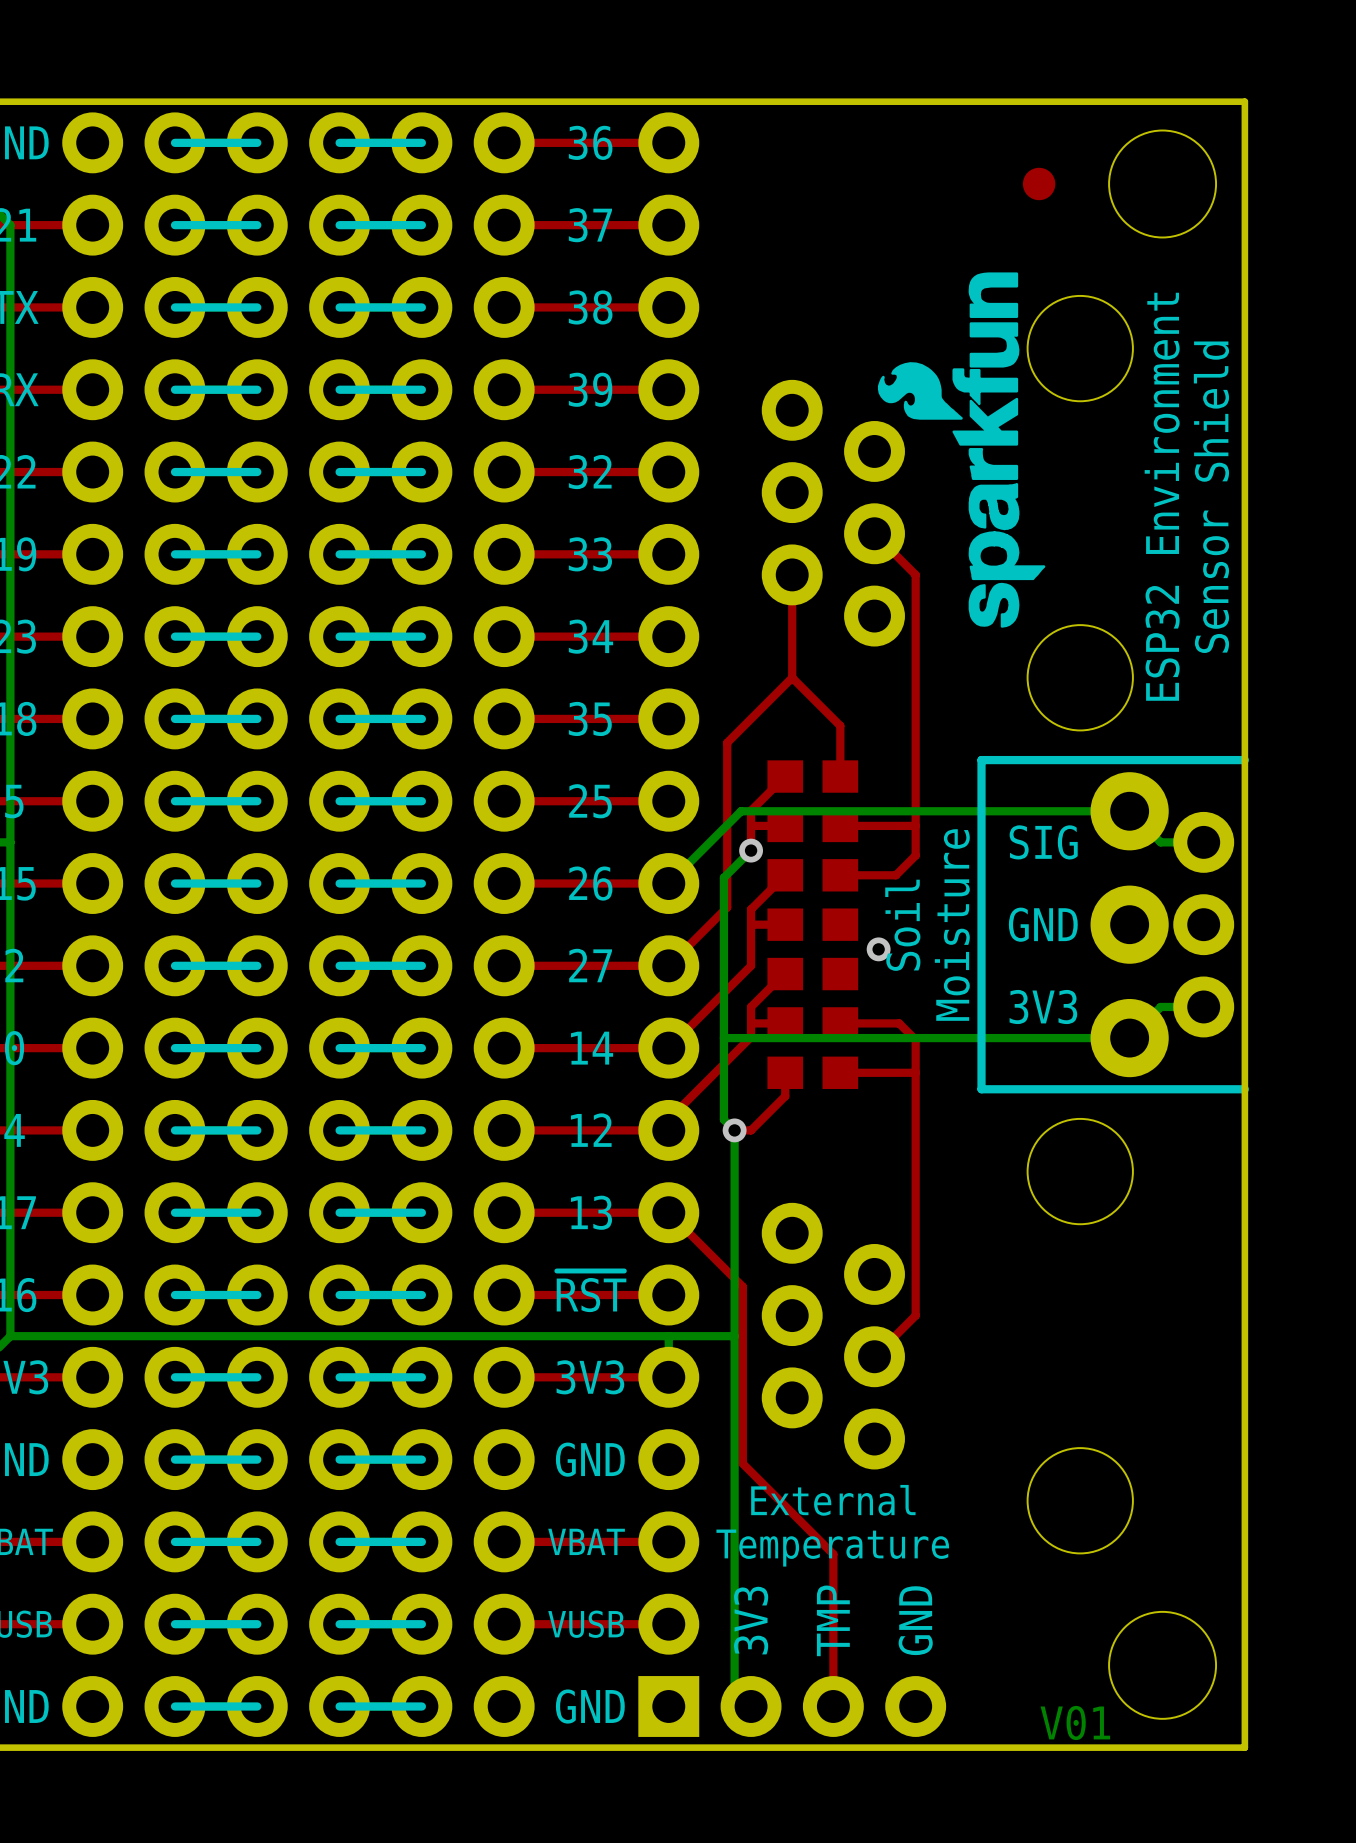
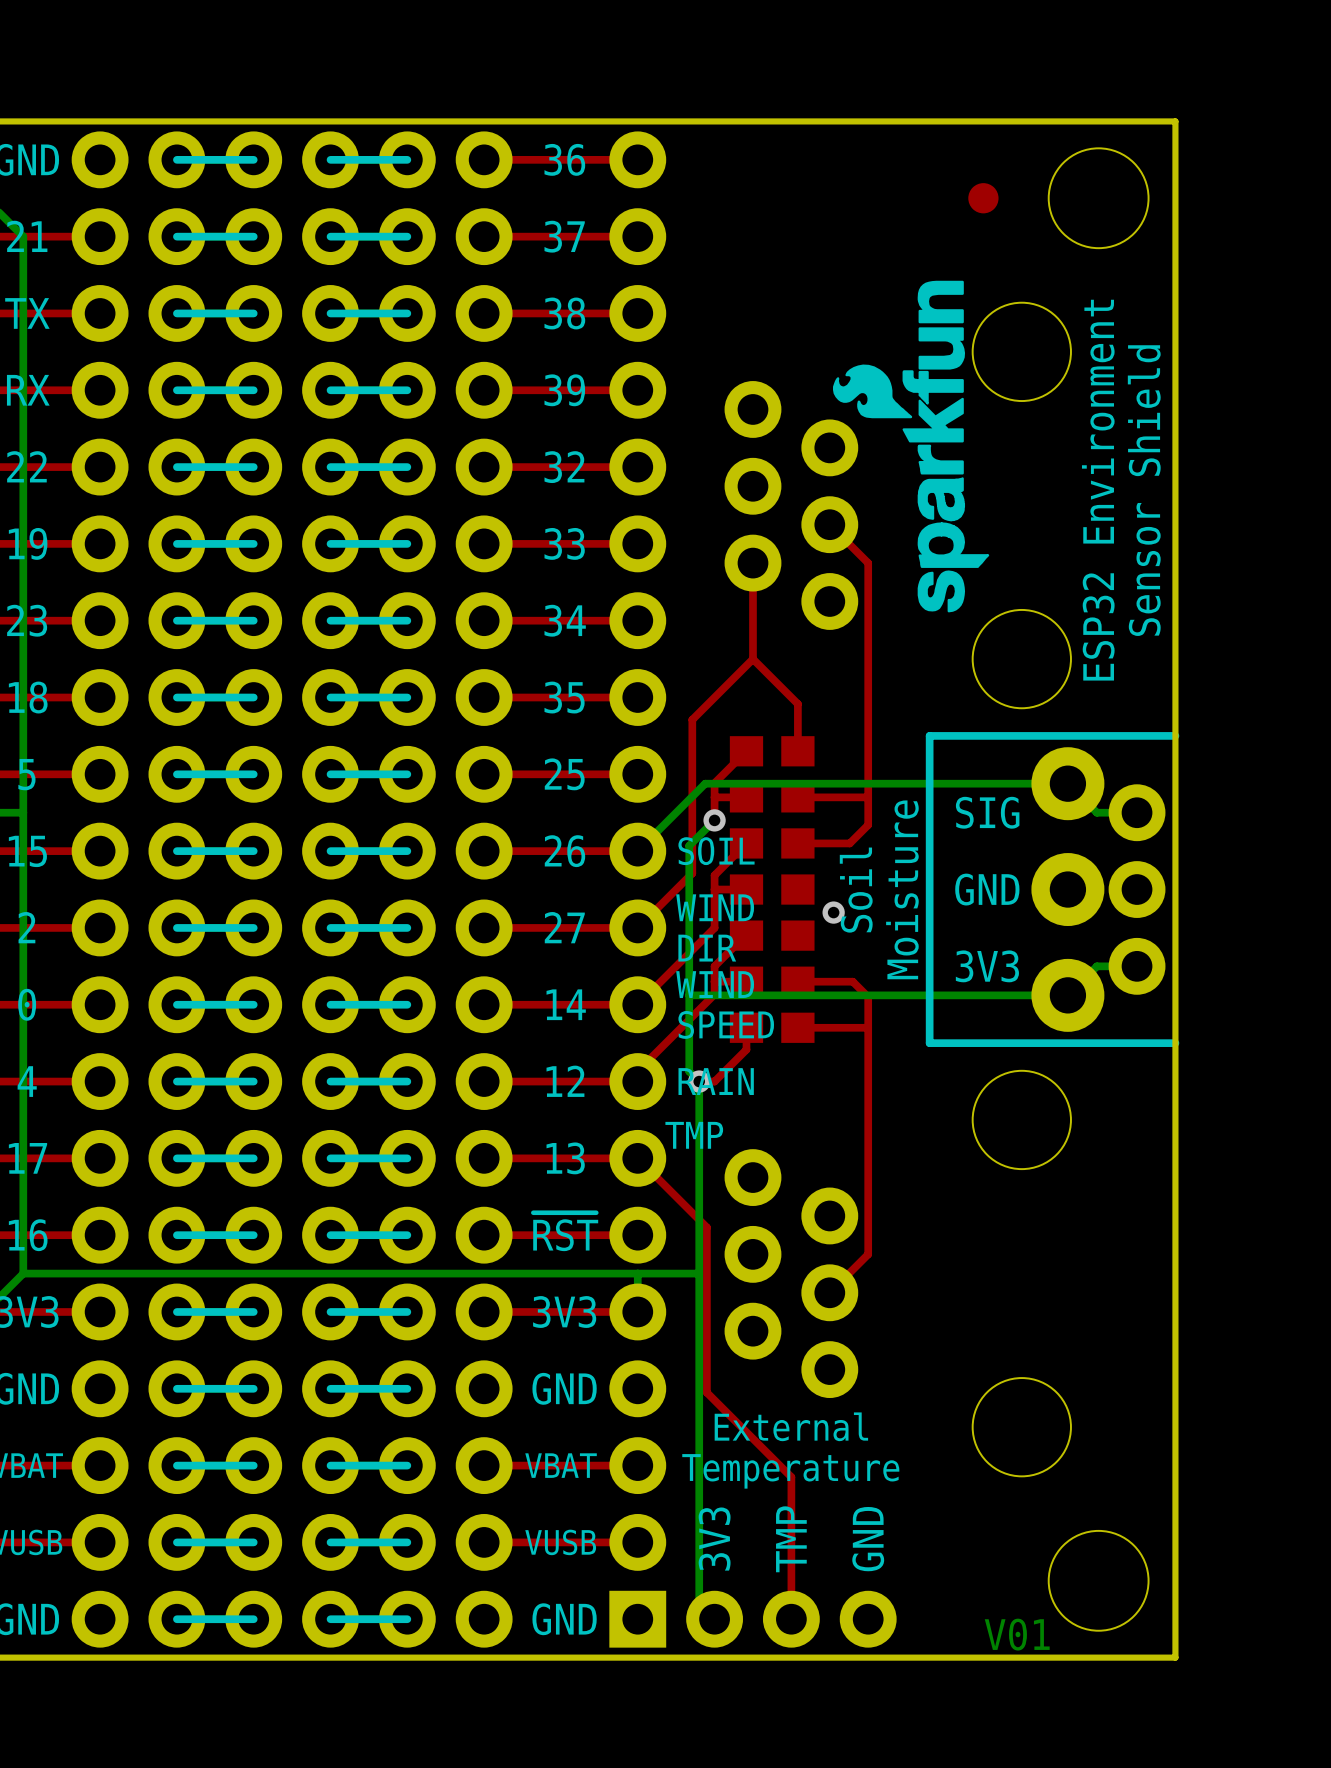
text: none -> SOIL (716, 851)
text: none -> WIND (715, 907)
text: none -> DIR (707, 948)
text: none -> WIND (715, 984)
text: none -> SPEED (726, 1024)
text: none -> RAIN (716, 1081)
text: none -> TMP (694, 1135)

